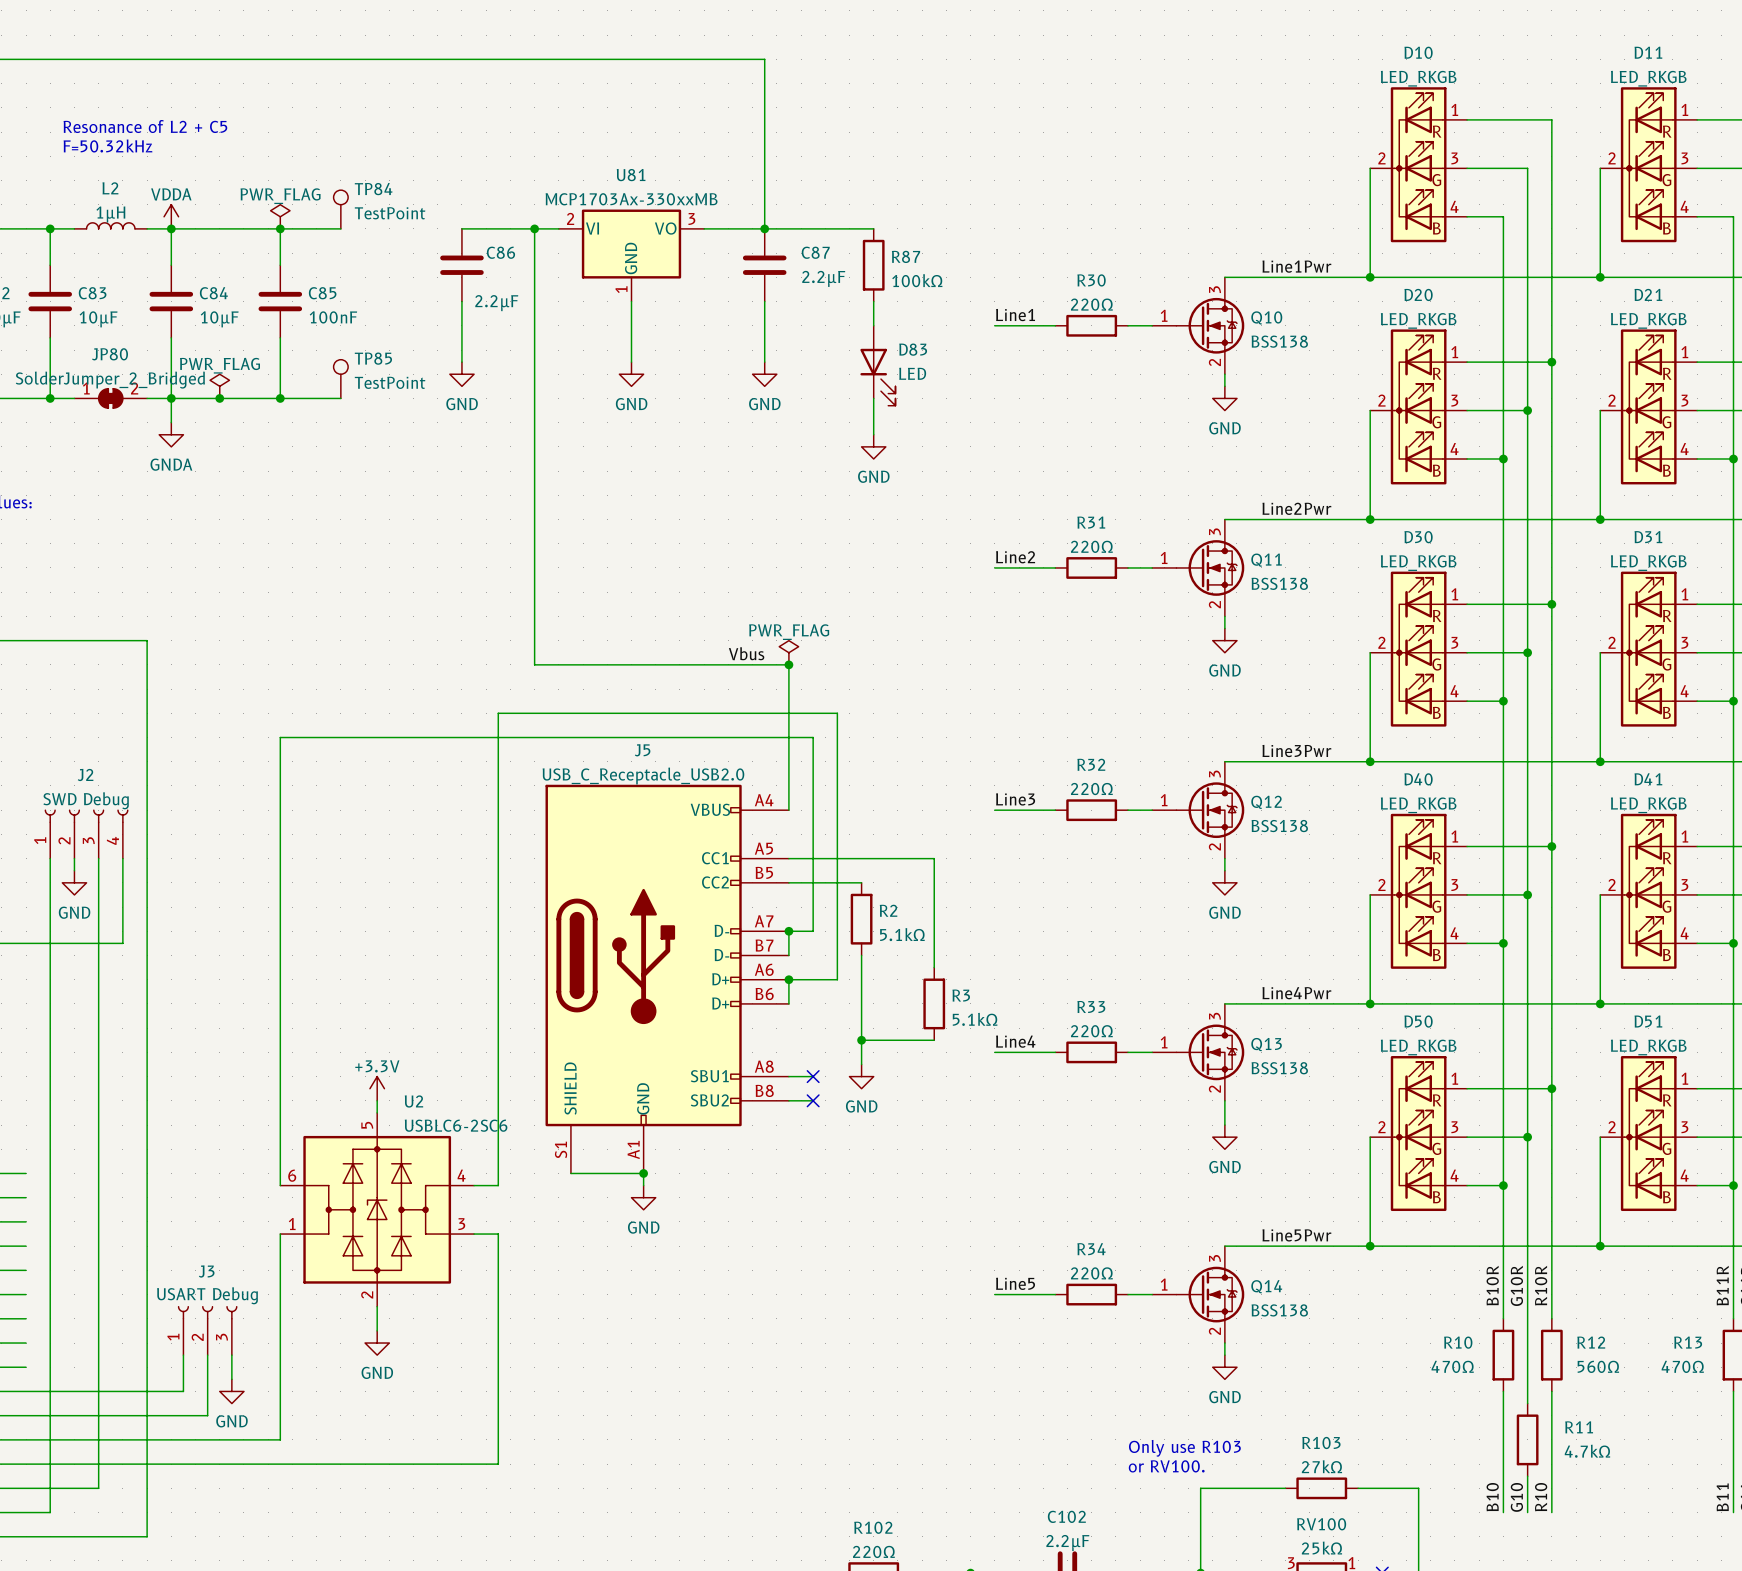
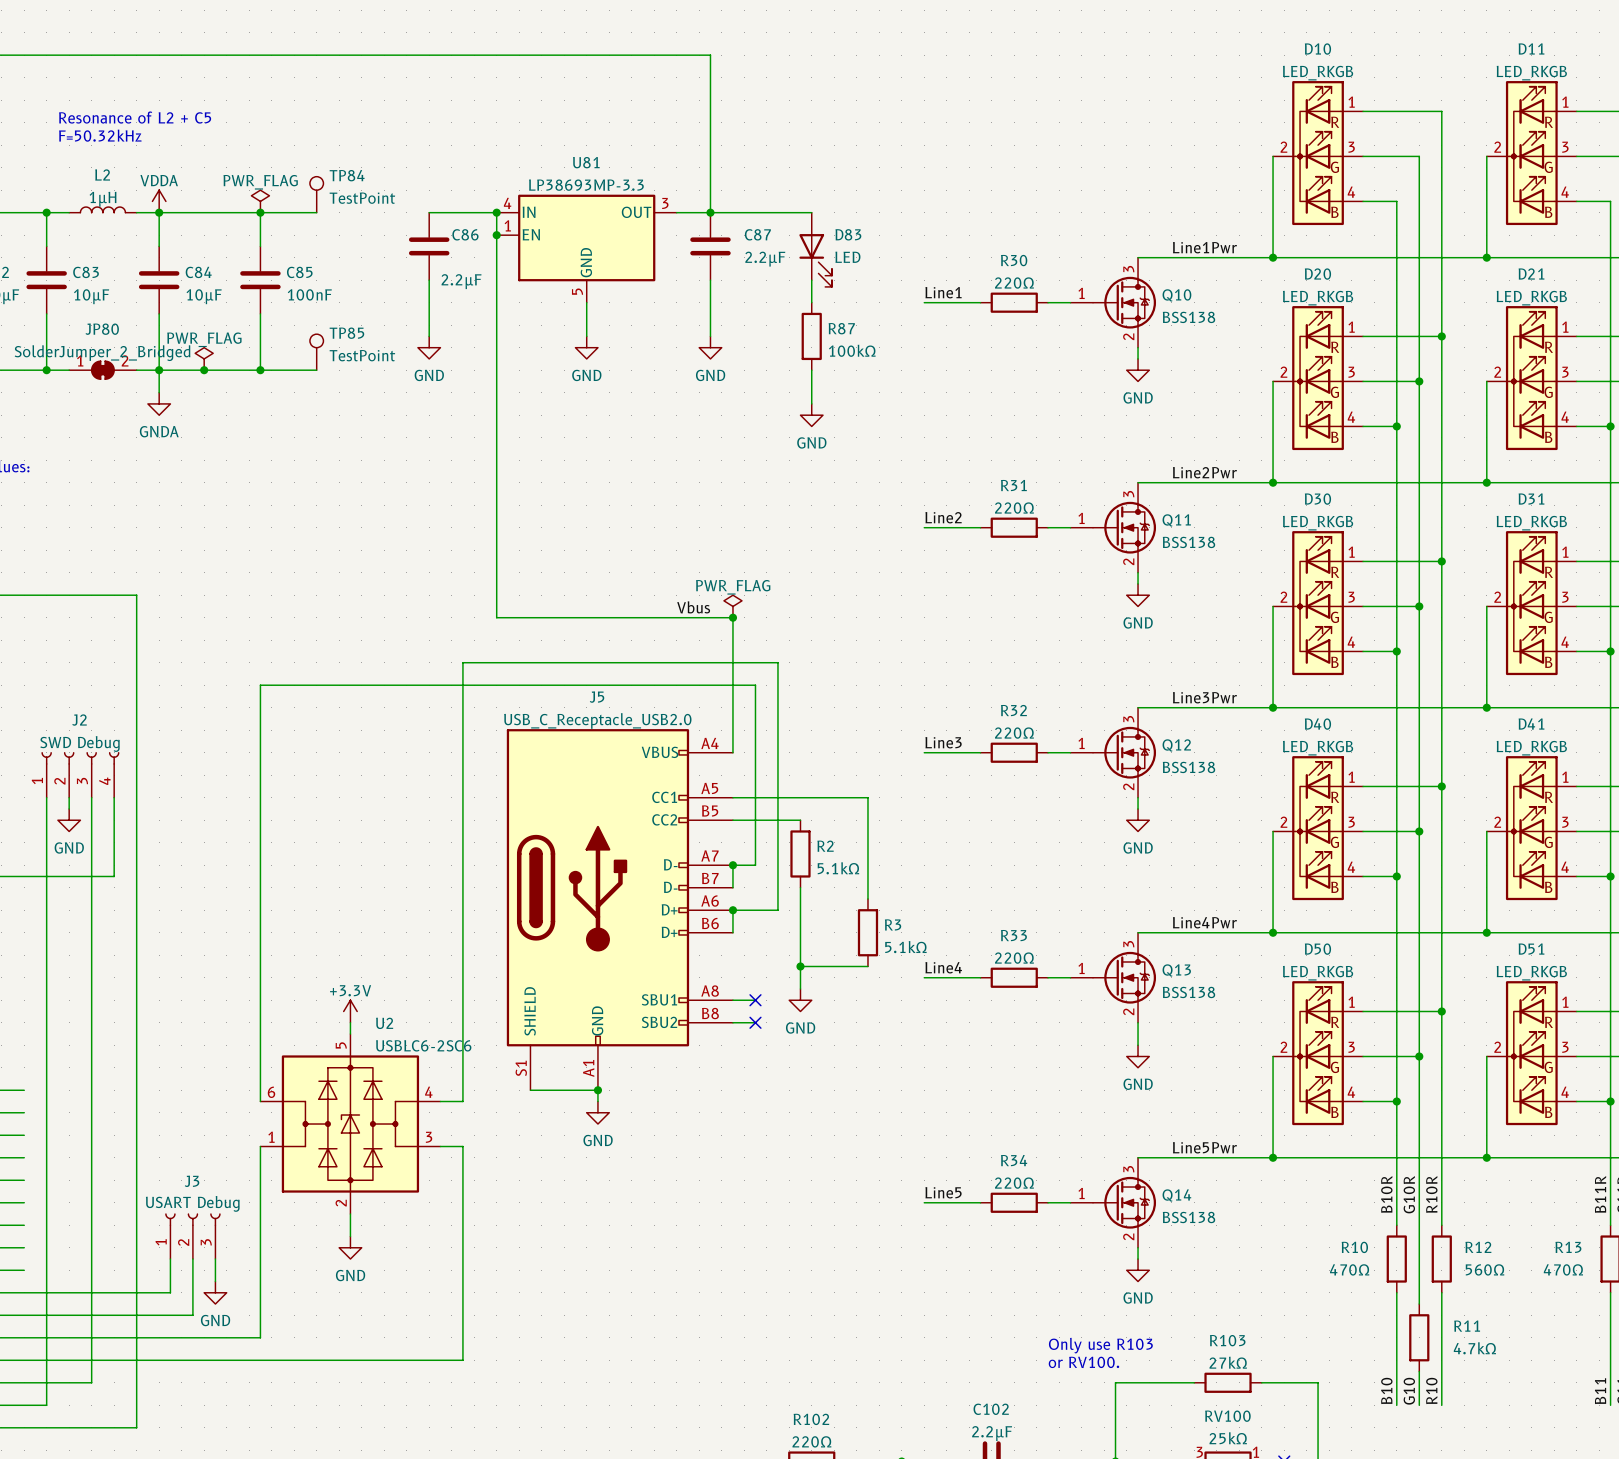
U81 value: MCP1703Ax-330xxMB (631, 199) -> LP38693MP-3.3 (586, 185)
U81 symbol: [558, 209, 705, 302] -> [496, 194, 677, 303]
junction: none -> (496, 235)
R87 position: (873, 265) -> (811, 336)
D83 position: (877, 365) -> (815, 249)

